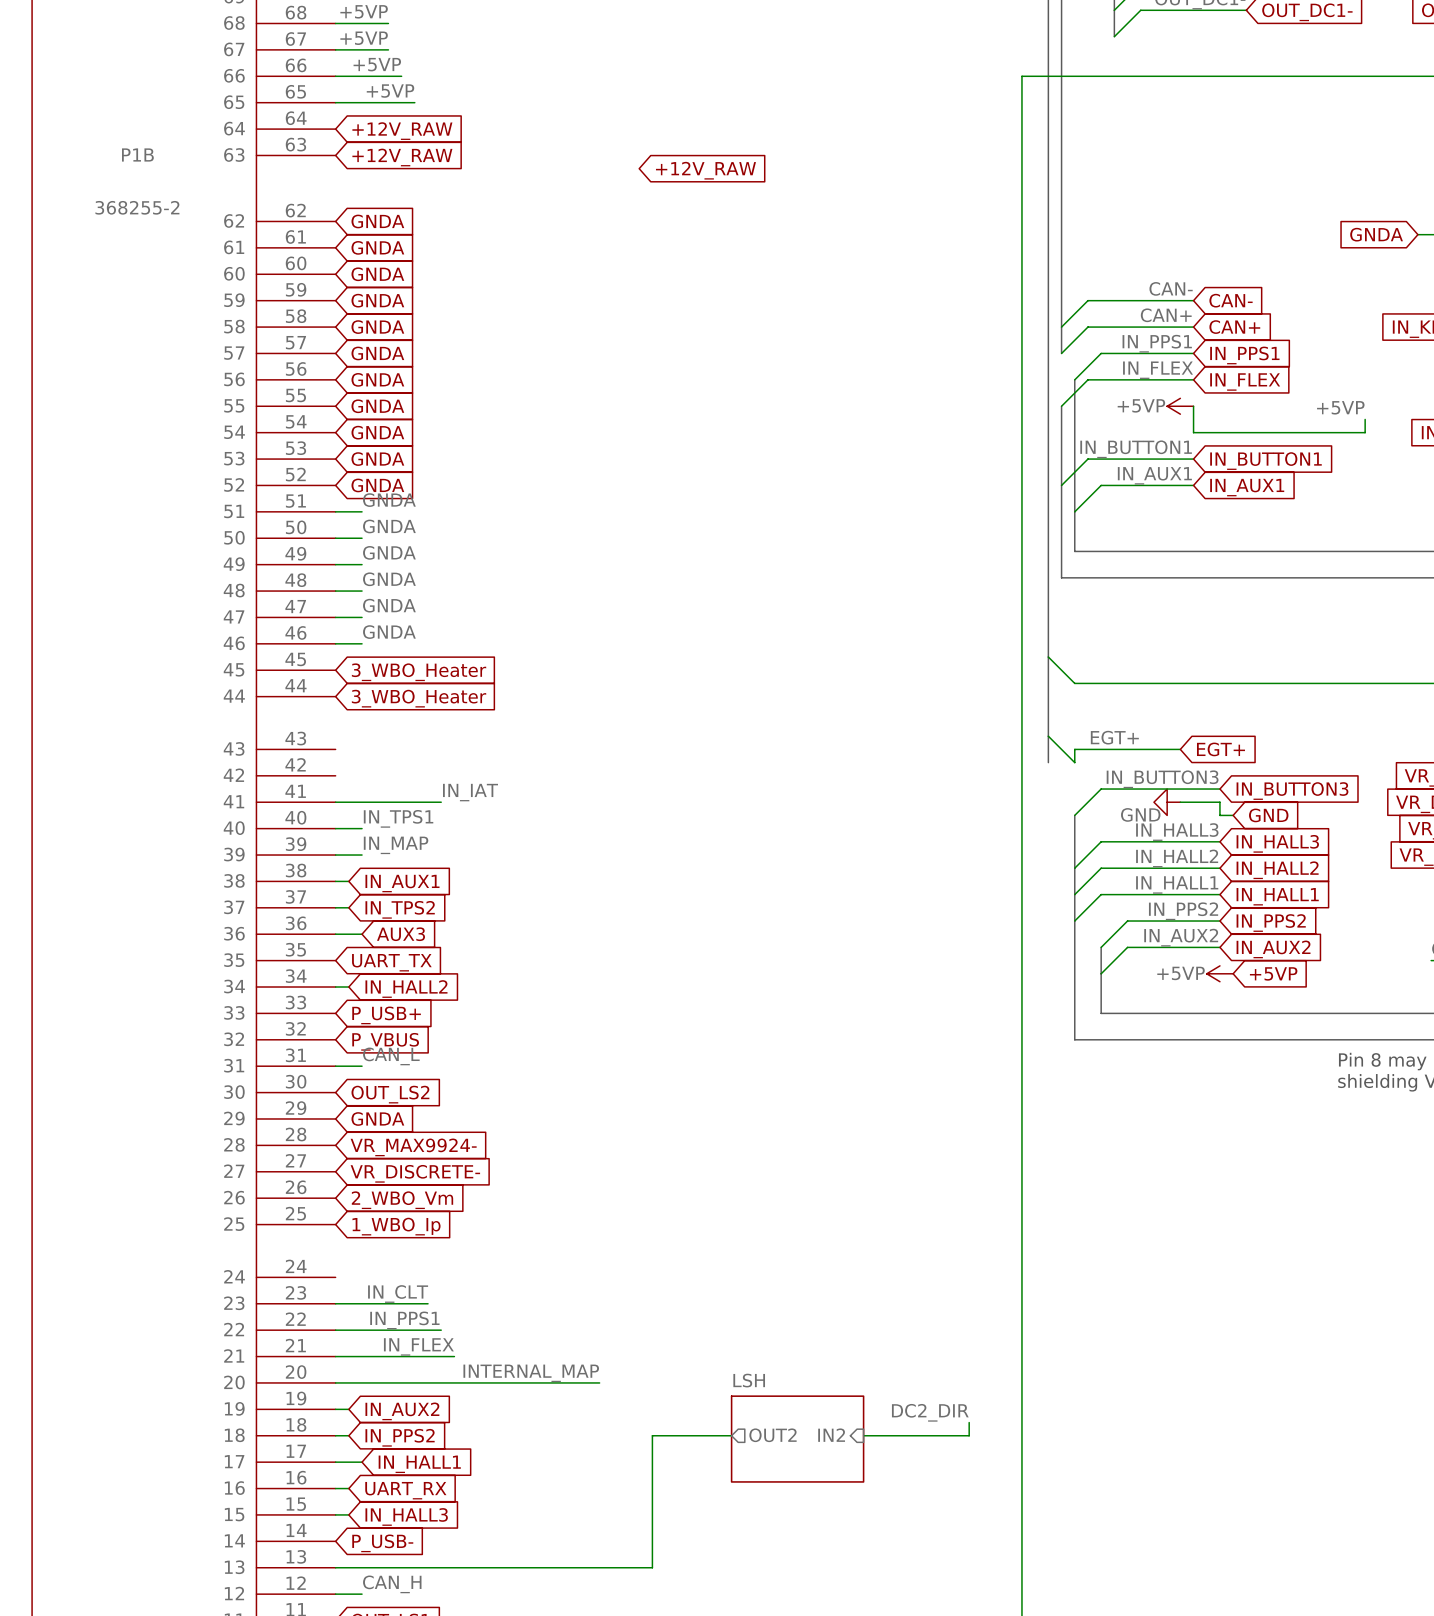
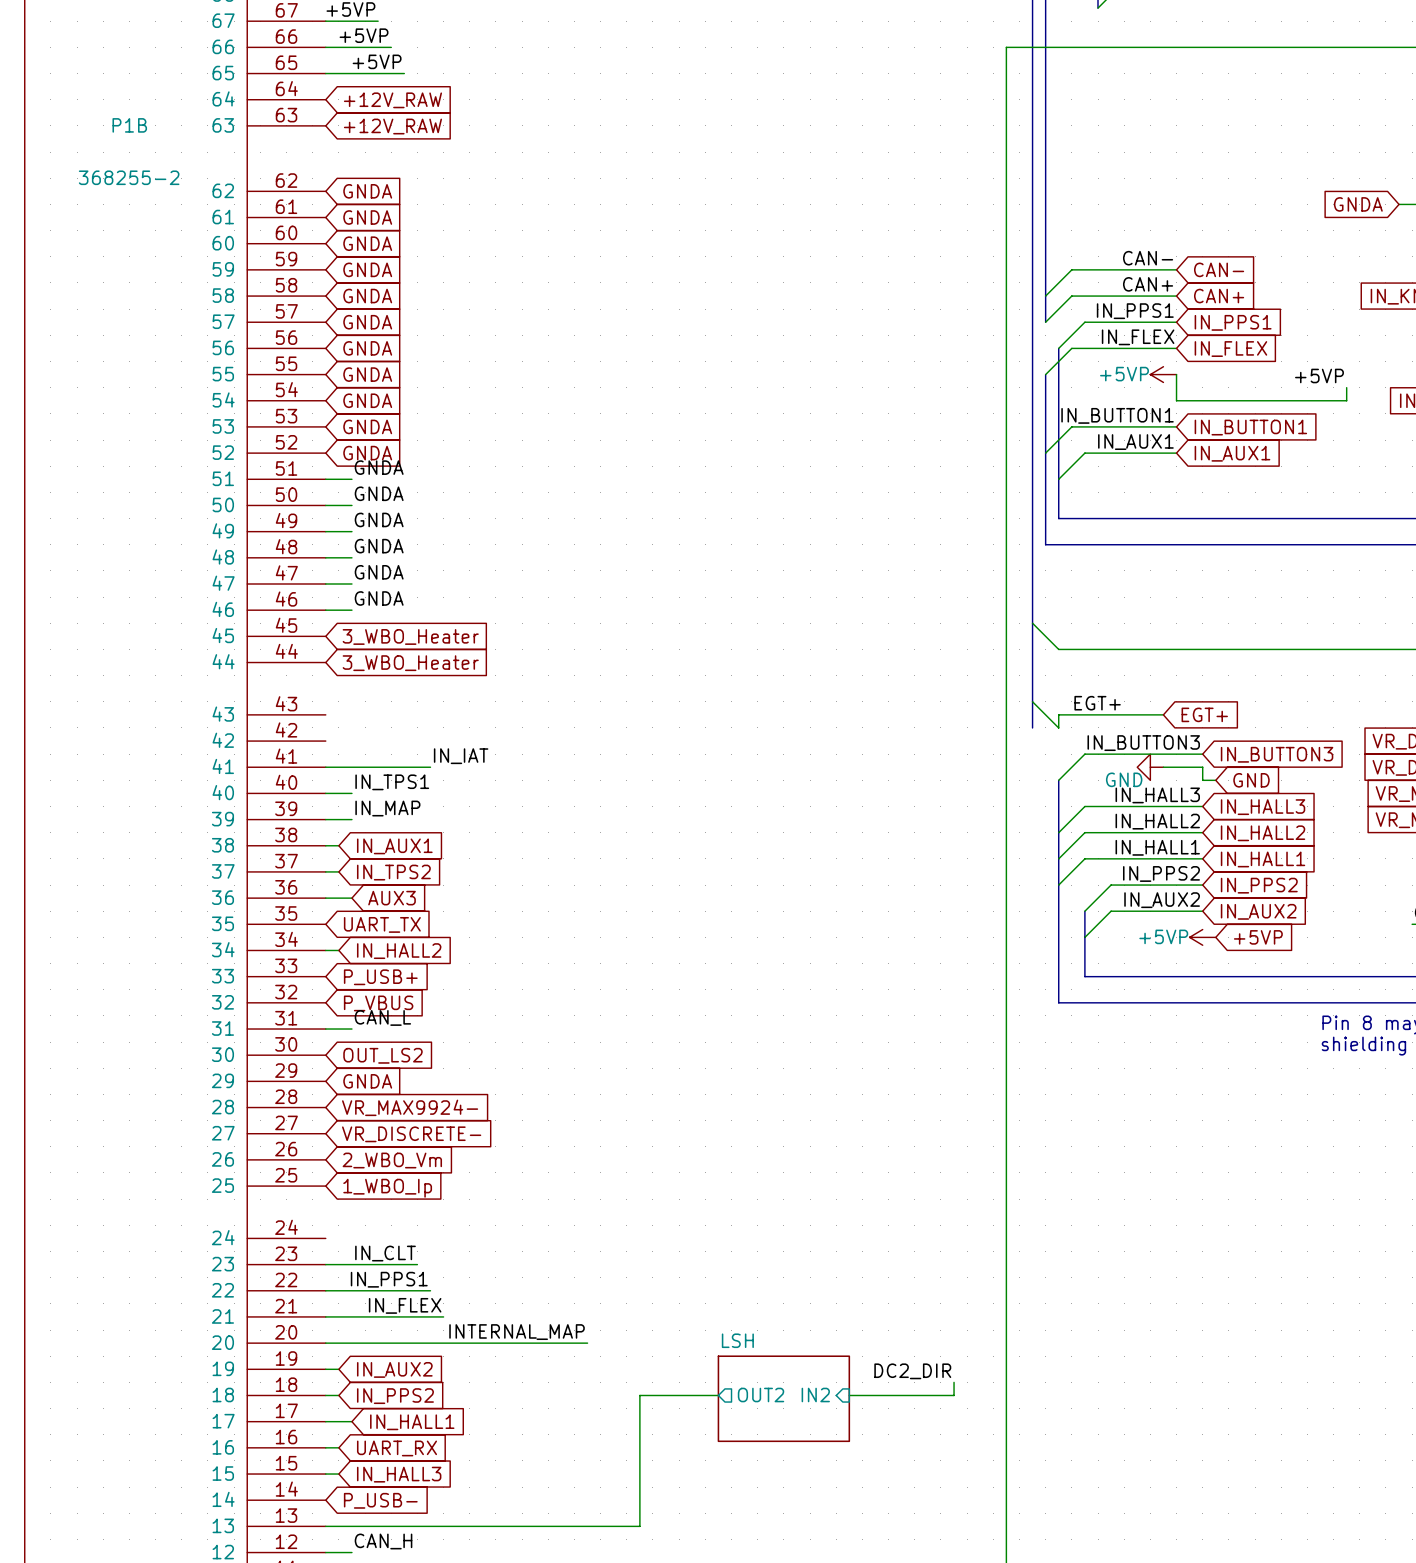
global label: +12V_RAW (705, 170) -> none

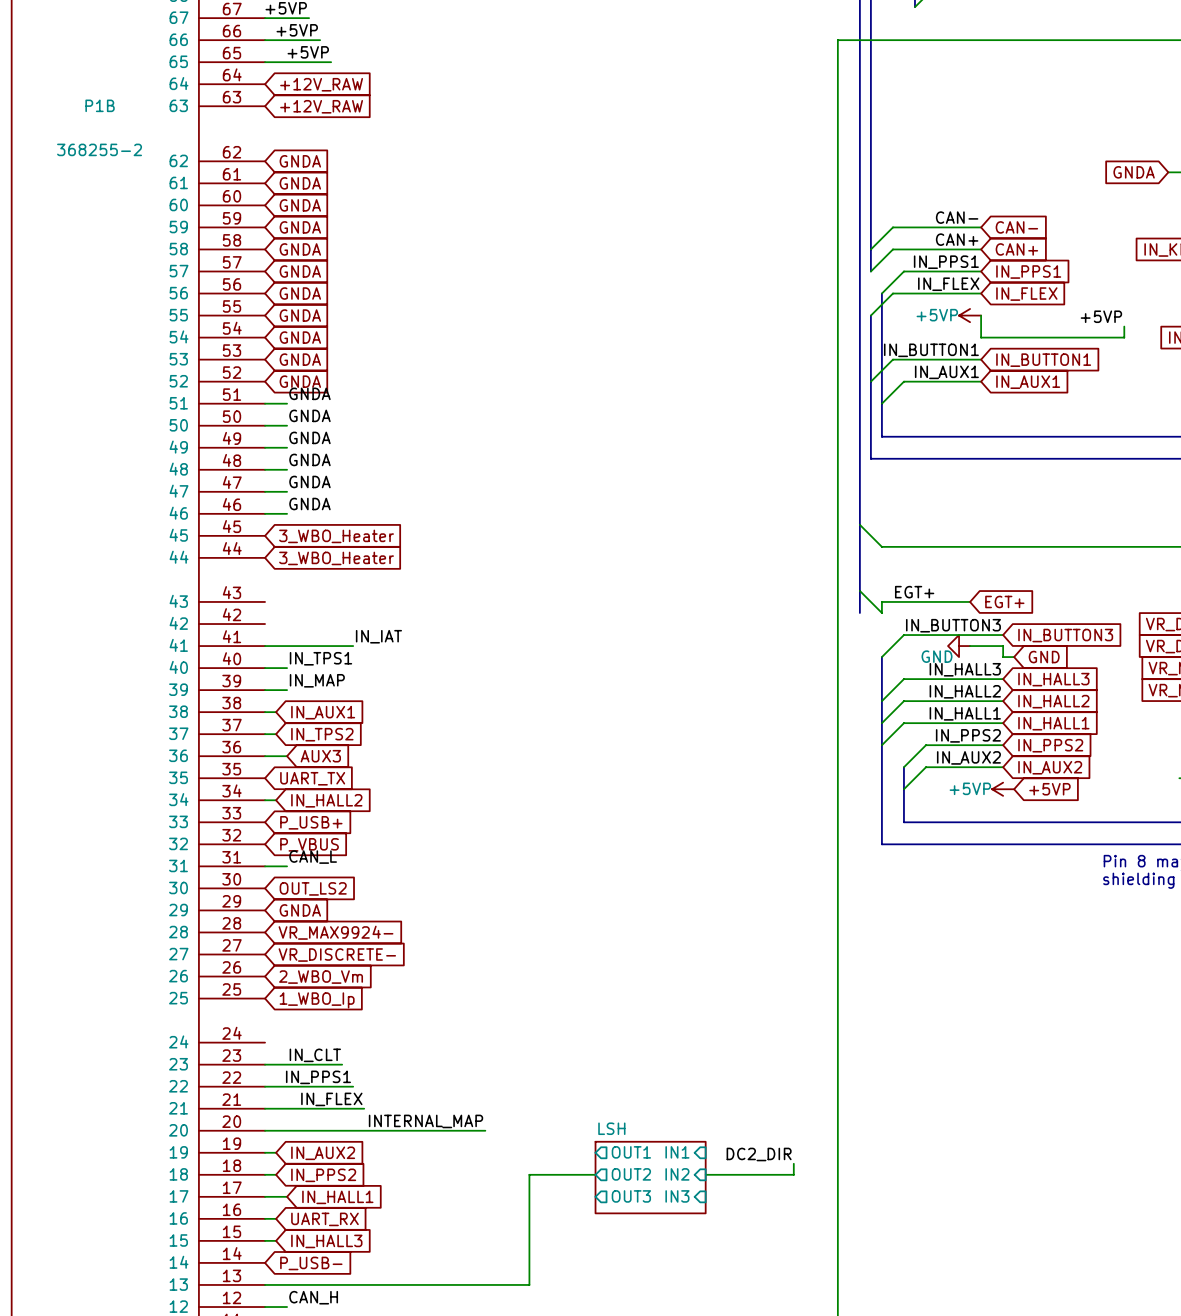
sheet pin: none -> OUT1 (631, 1152)
sheet pin: none -> IN1 (677, 1152)
sheet pin: none -> OUT3 (631, 1196)
sheet pin: none -> IN3 (677, 1196)

